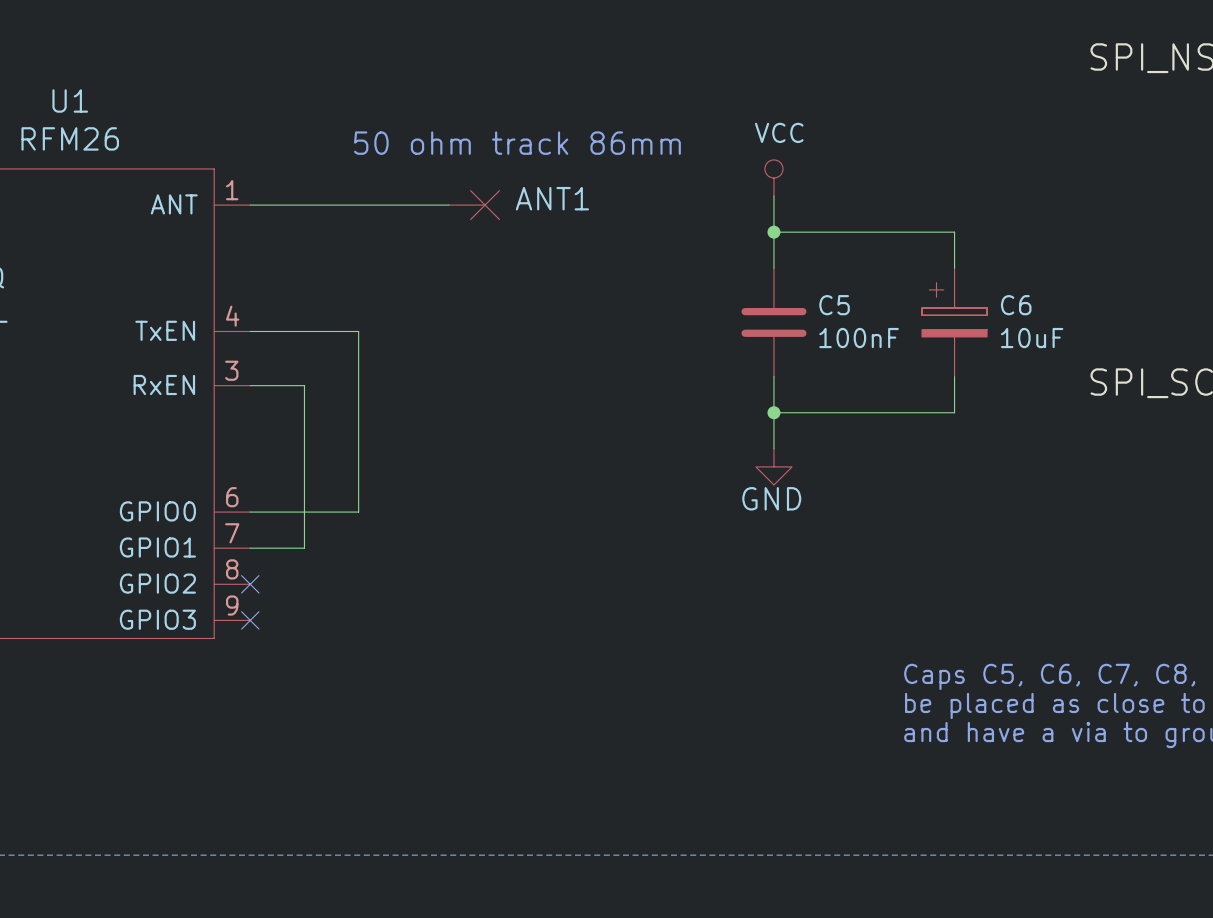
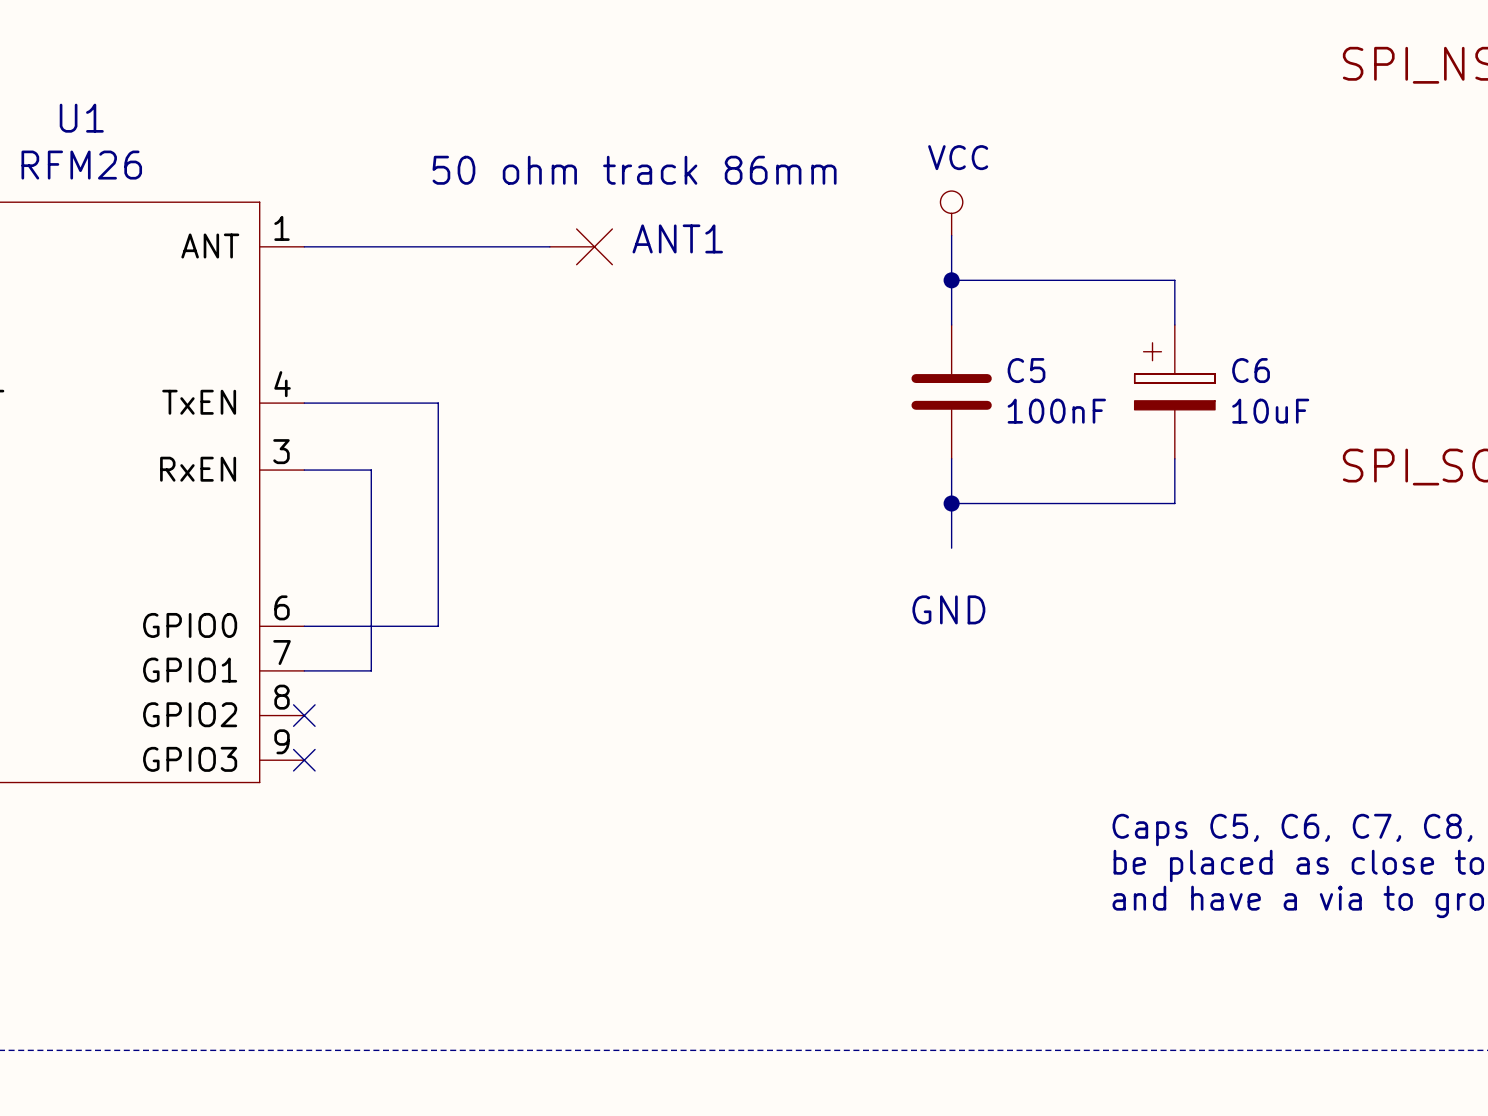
power symbol: GND (773, 466) -> none

